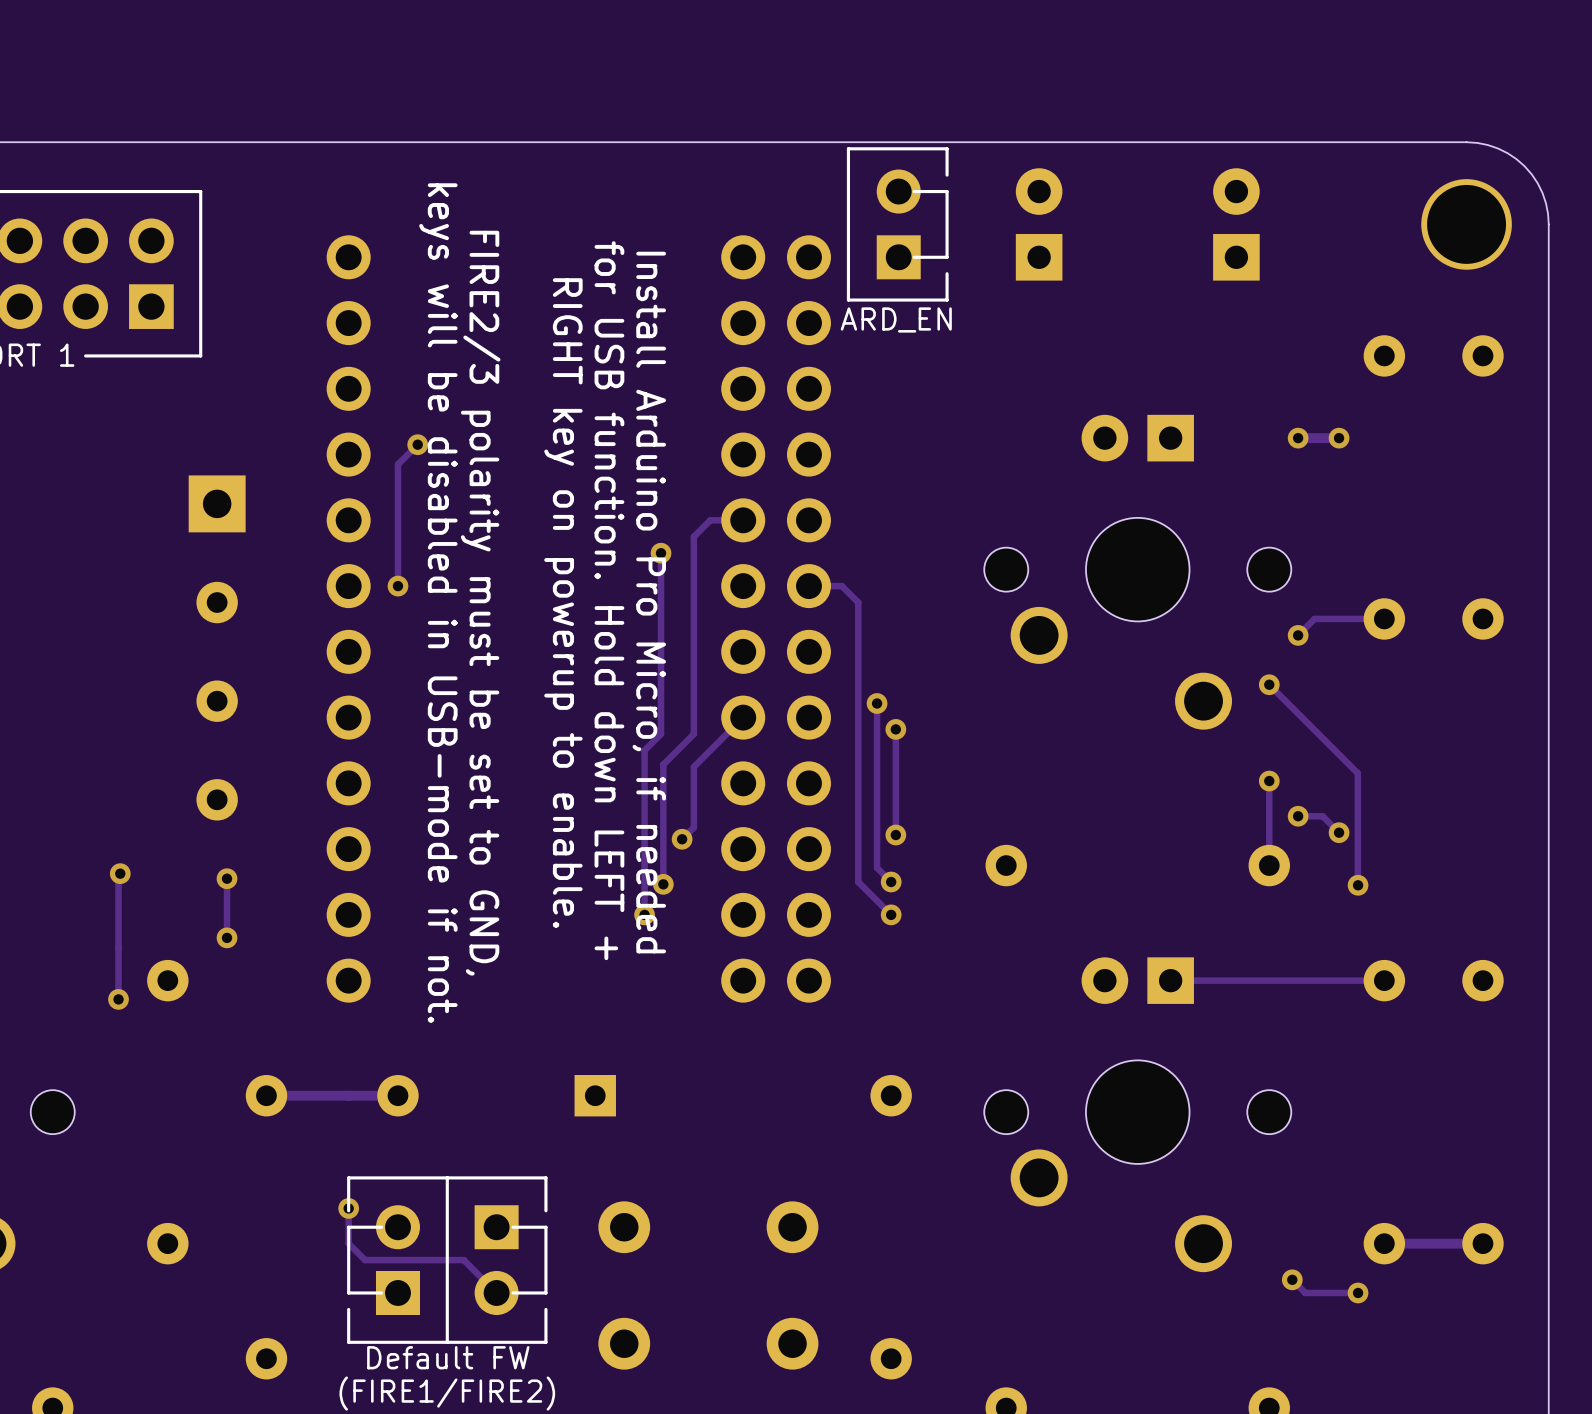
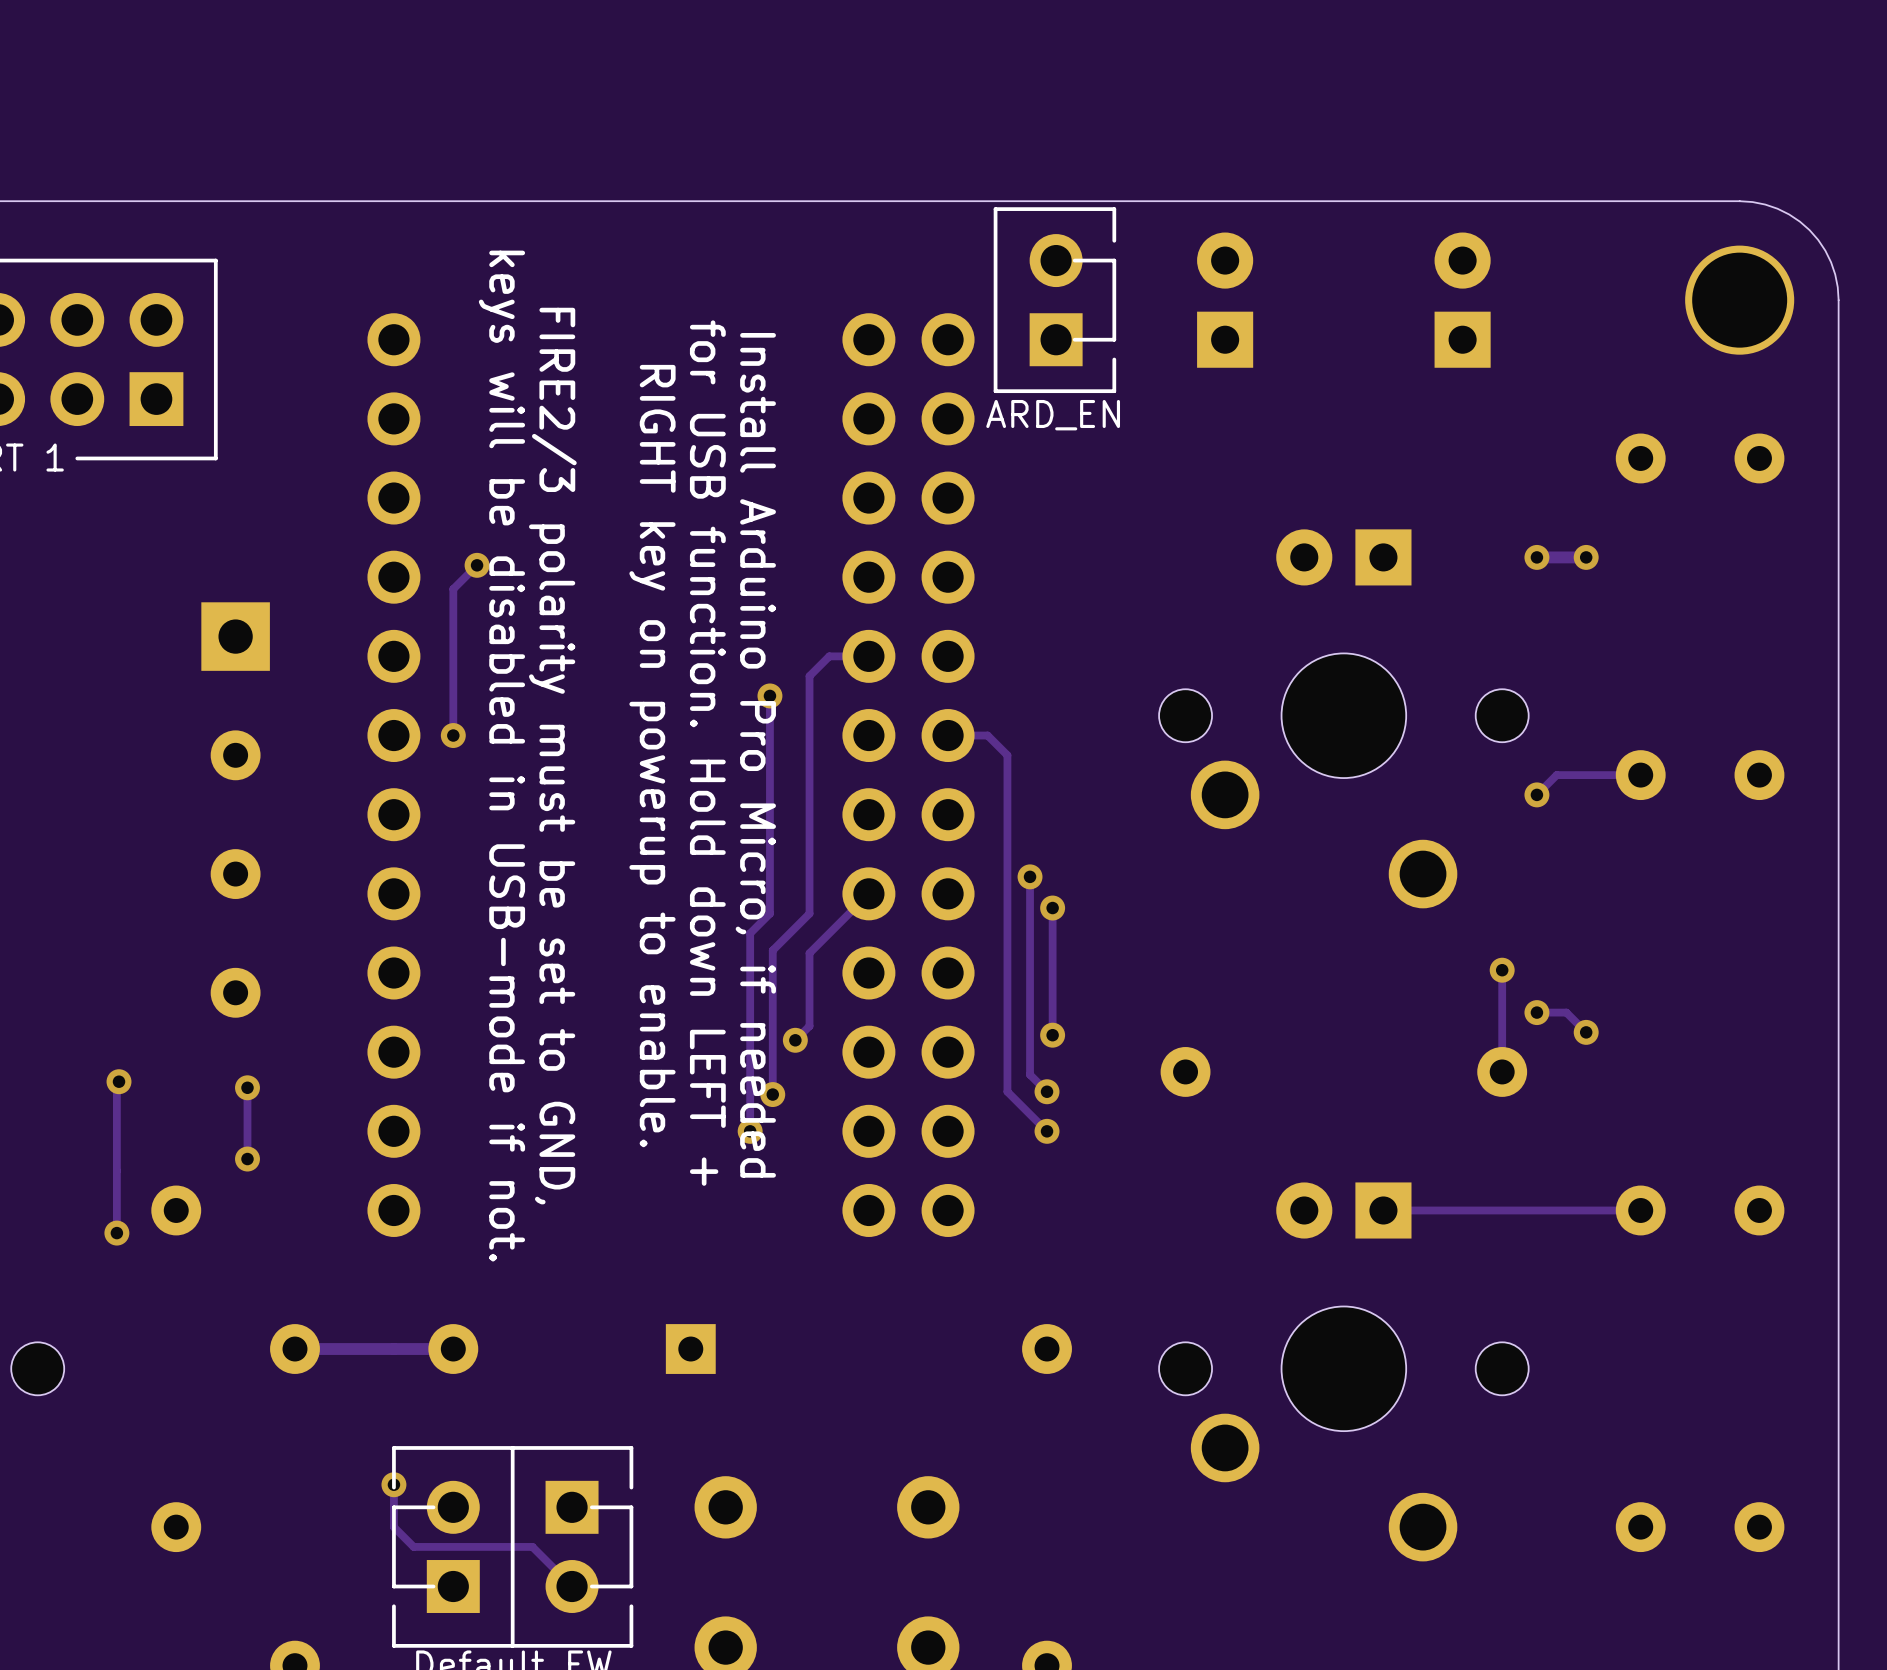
track: (1269, 684) (1357, 773) (1357, 885) -> none
via: (1269, 684) -> none
via: (1358, 885) -> none
track: (1482, 1243) (1384, 1243) -> none
track: (1292, 1279) (1305, 1292) (1358, 1292) -> none
via: (1292, 1279) -> none
via: (1358, 1292) -> none

